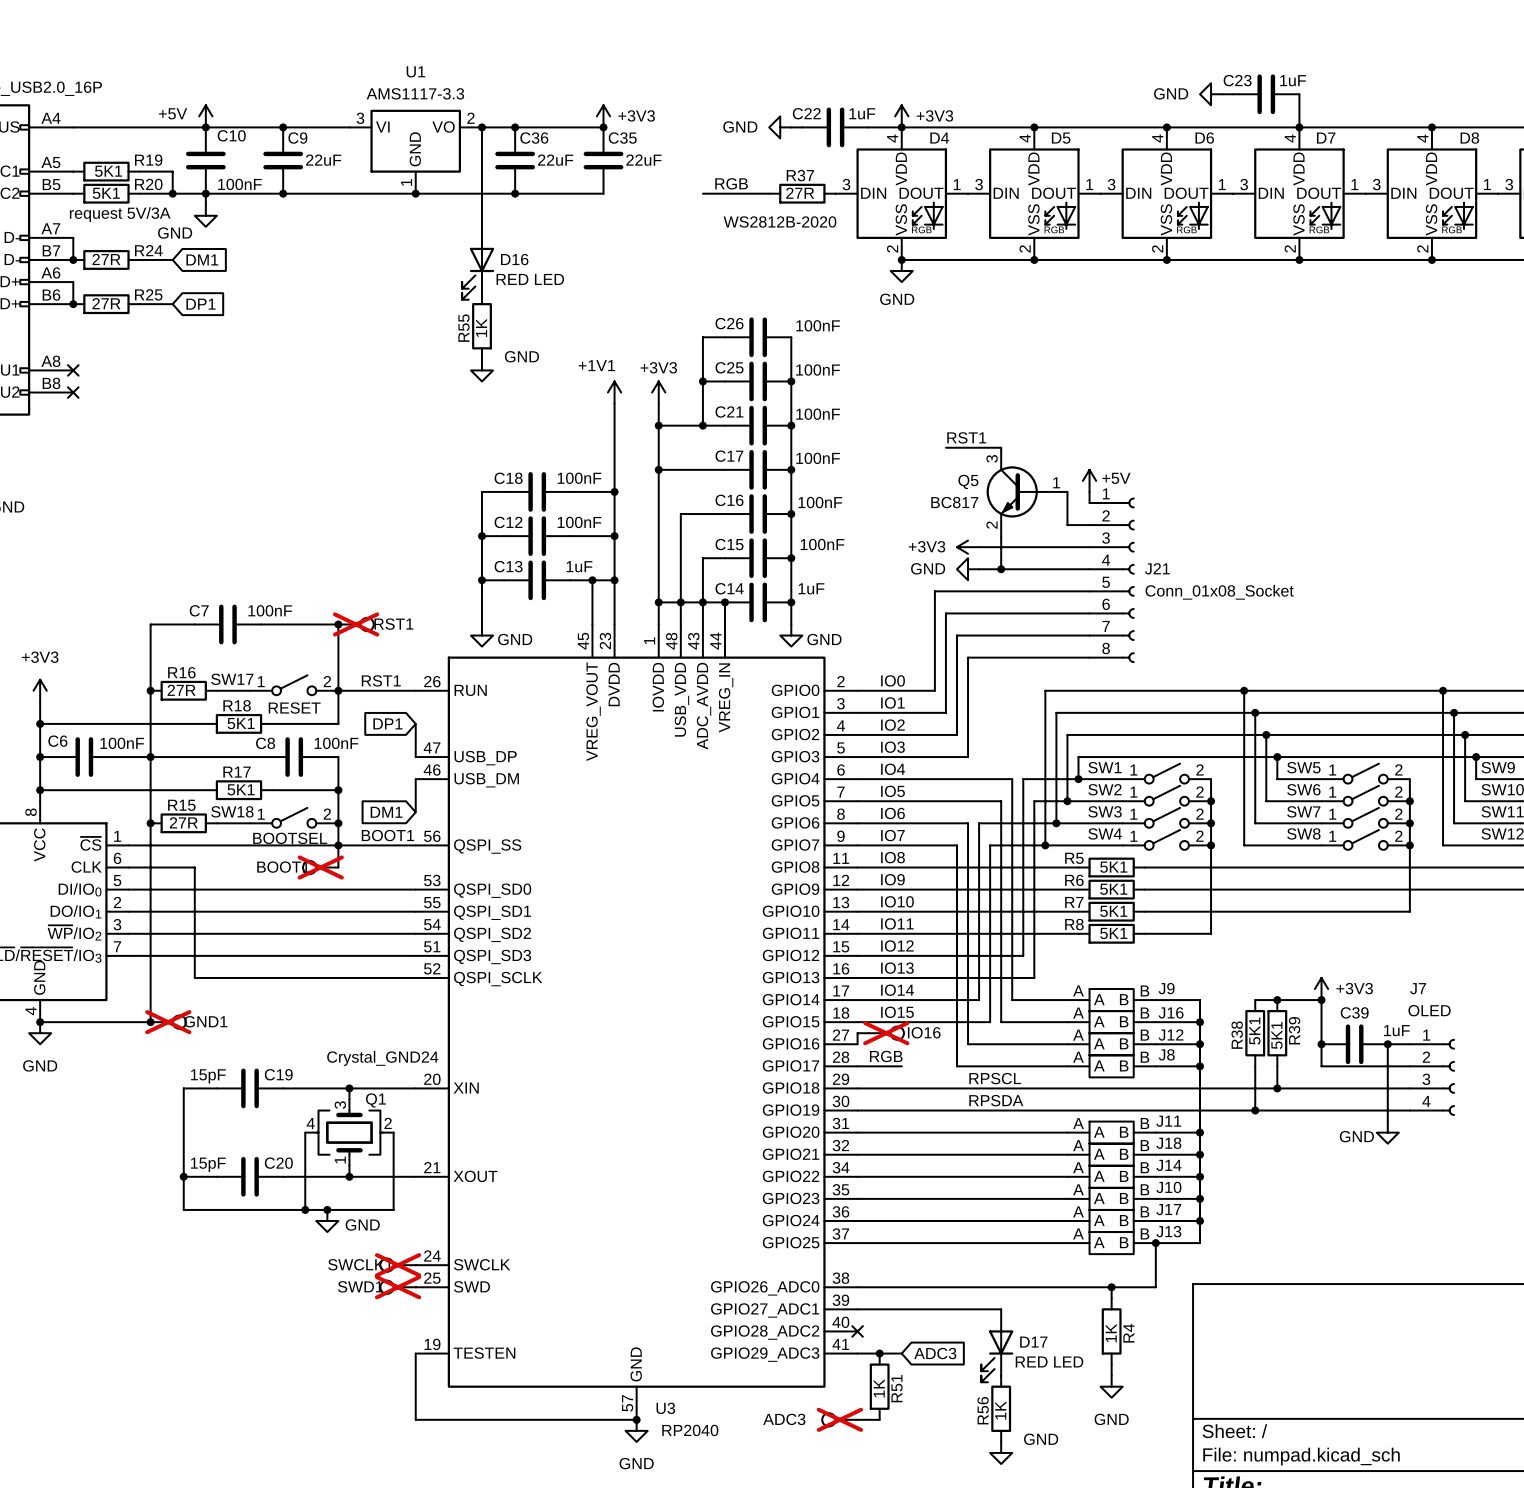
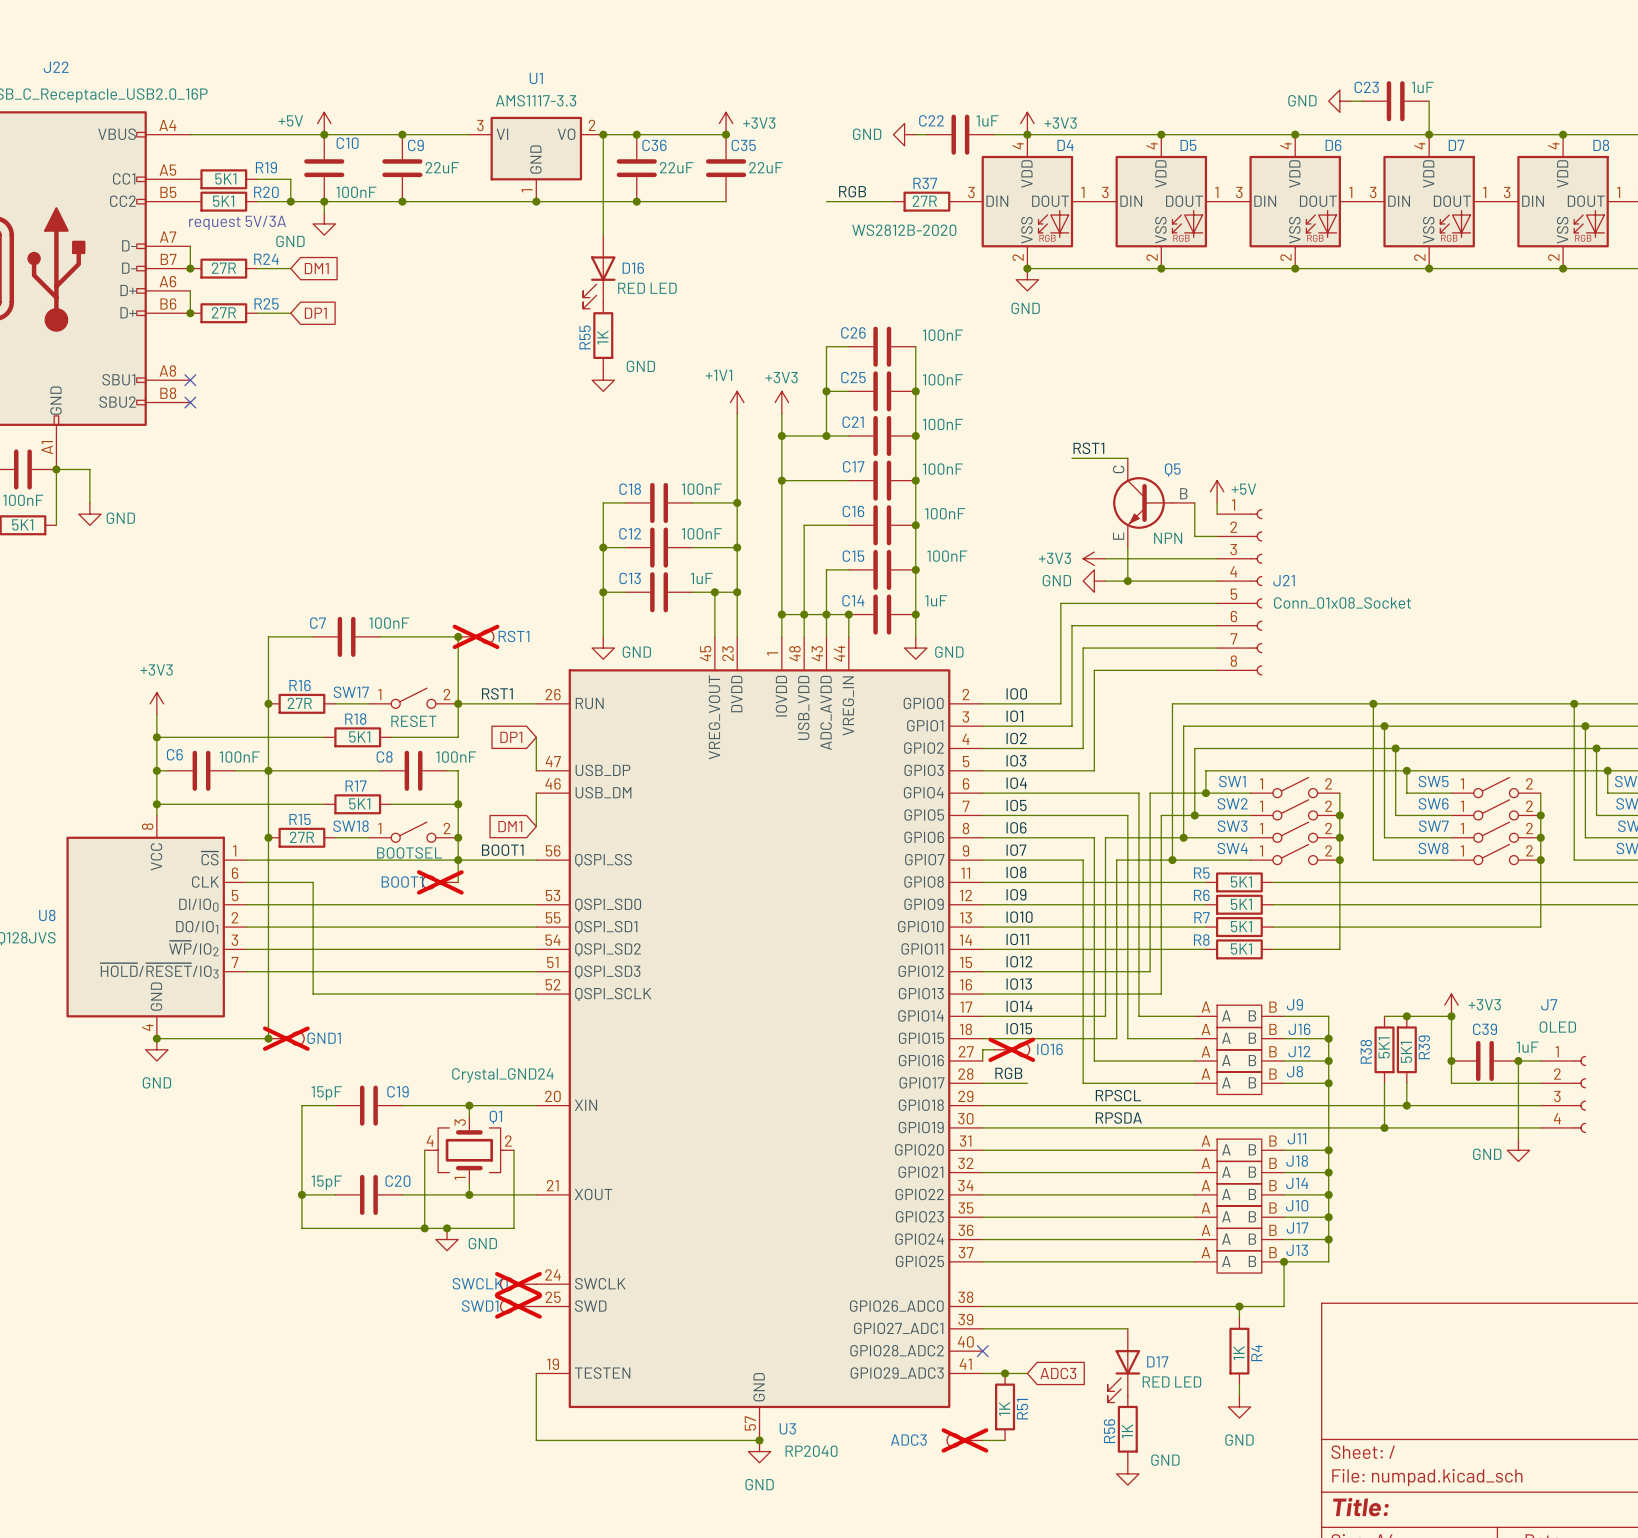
Q5 symbol: [986, 447, 1068, 537] -> [1113, 458, 1195, 548]
Q5 name position: Q5 (968, 481) -> Q5 (1172, 469)
Q5 value: BC817 (954, 502) -> NPN (1168, 538)

